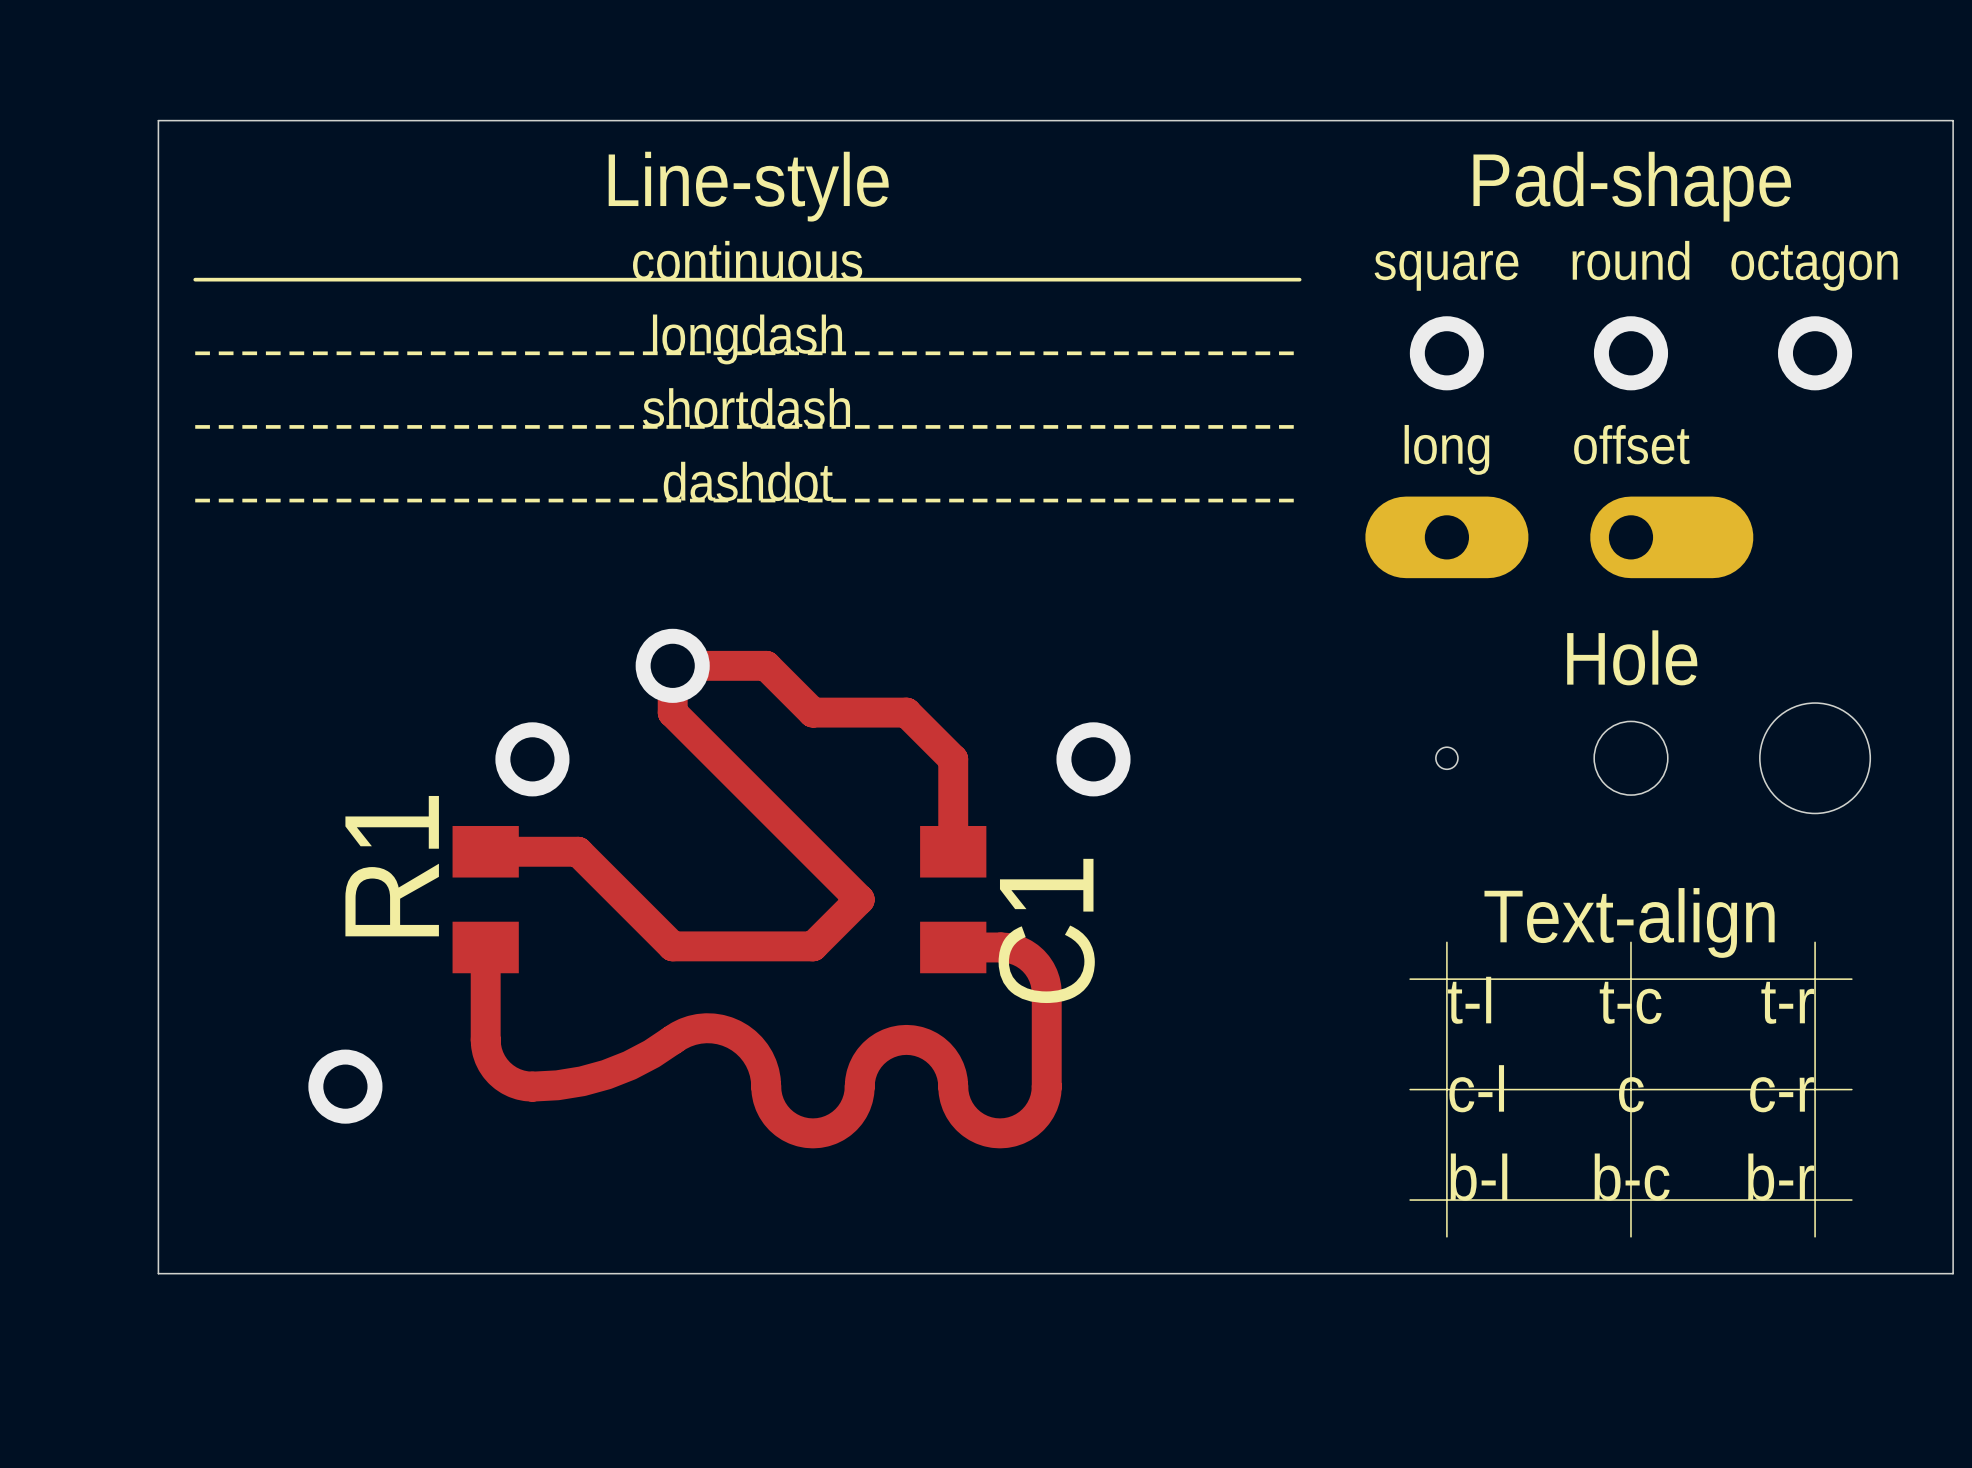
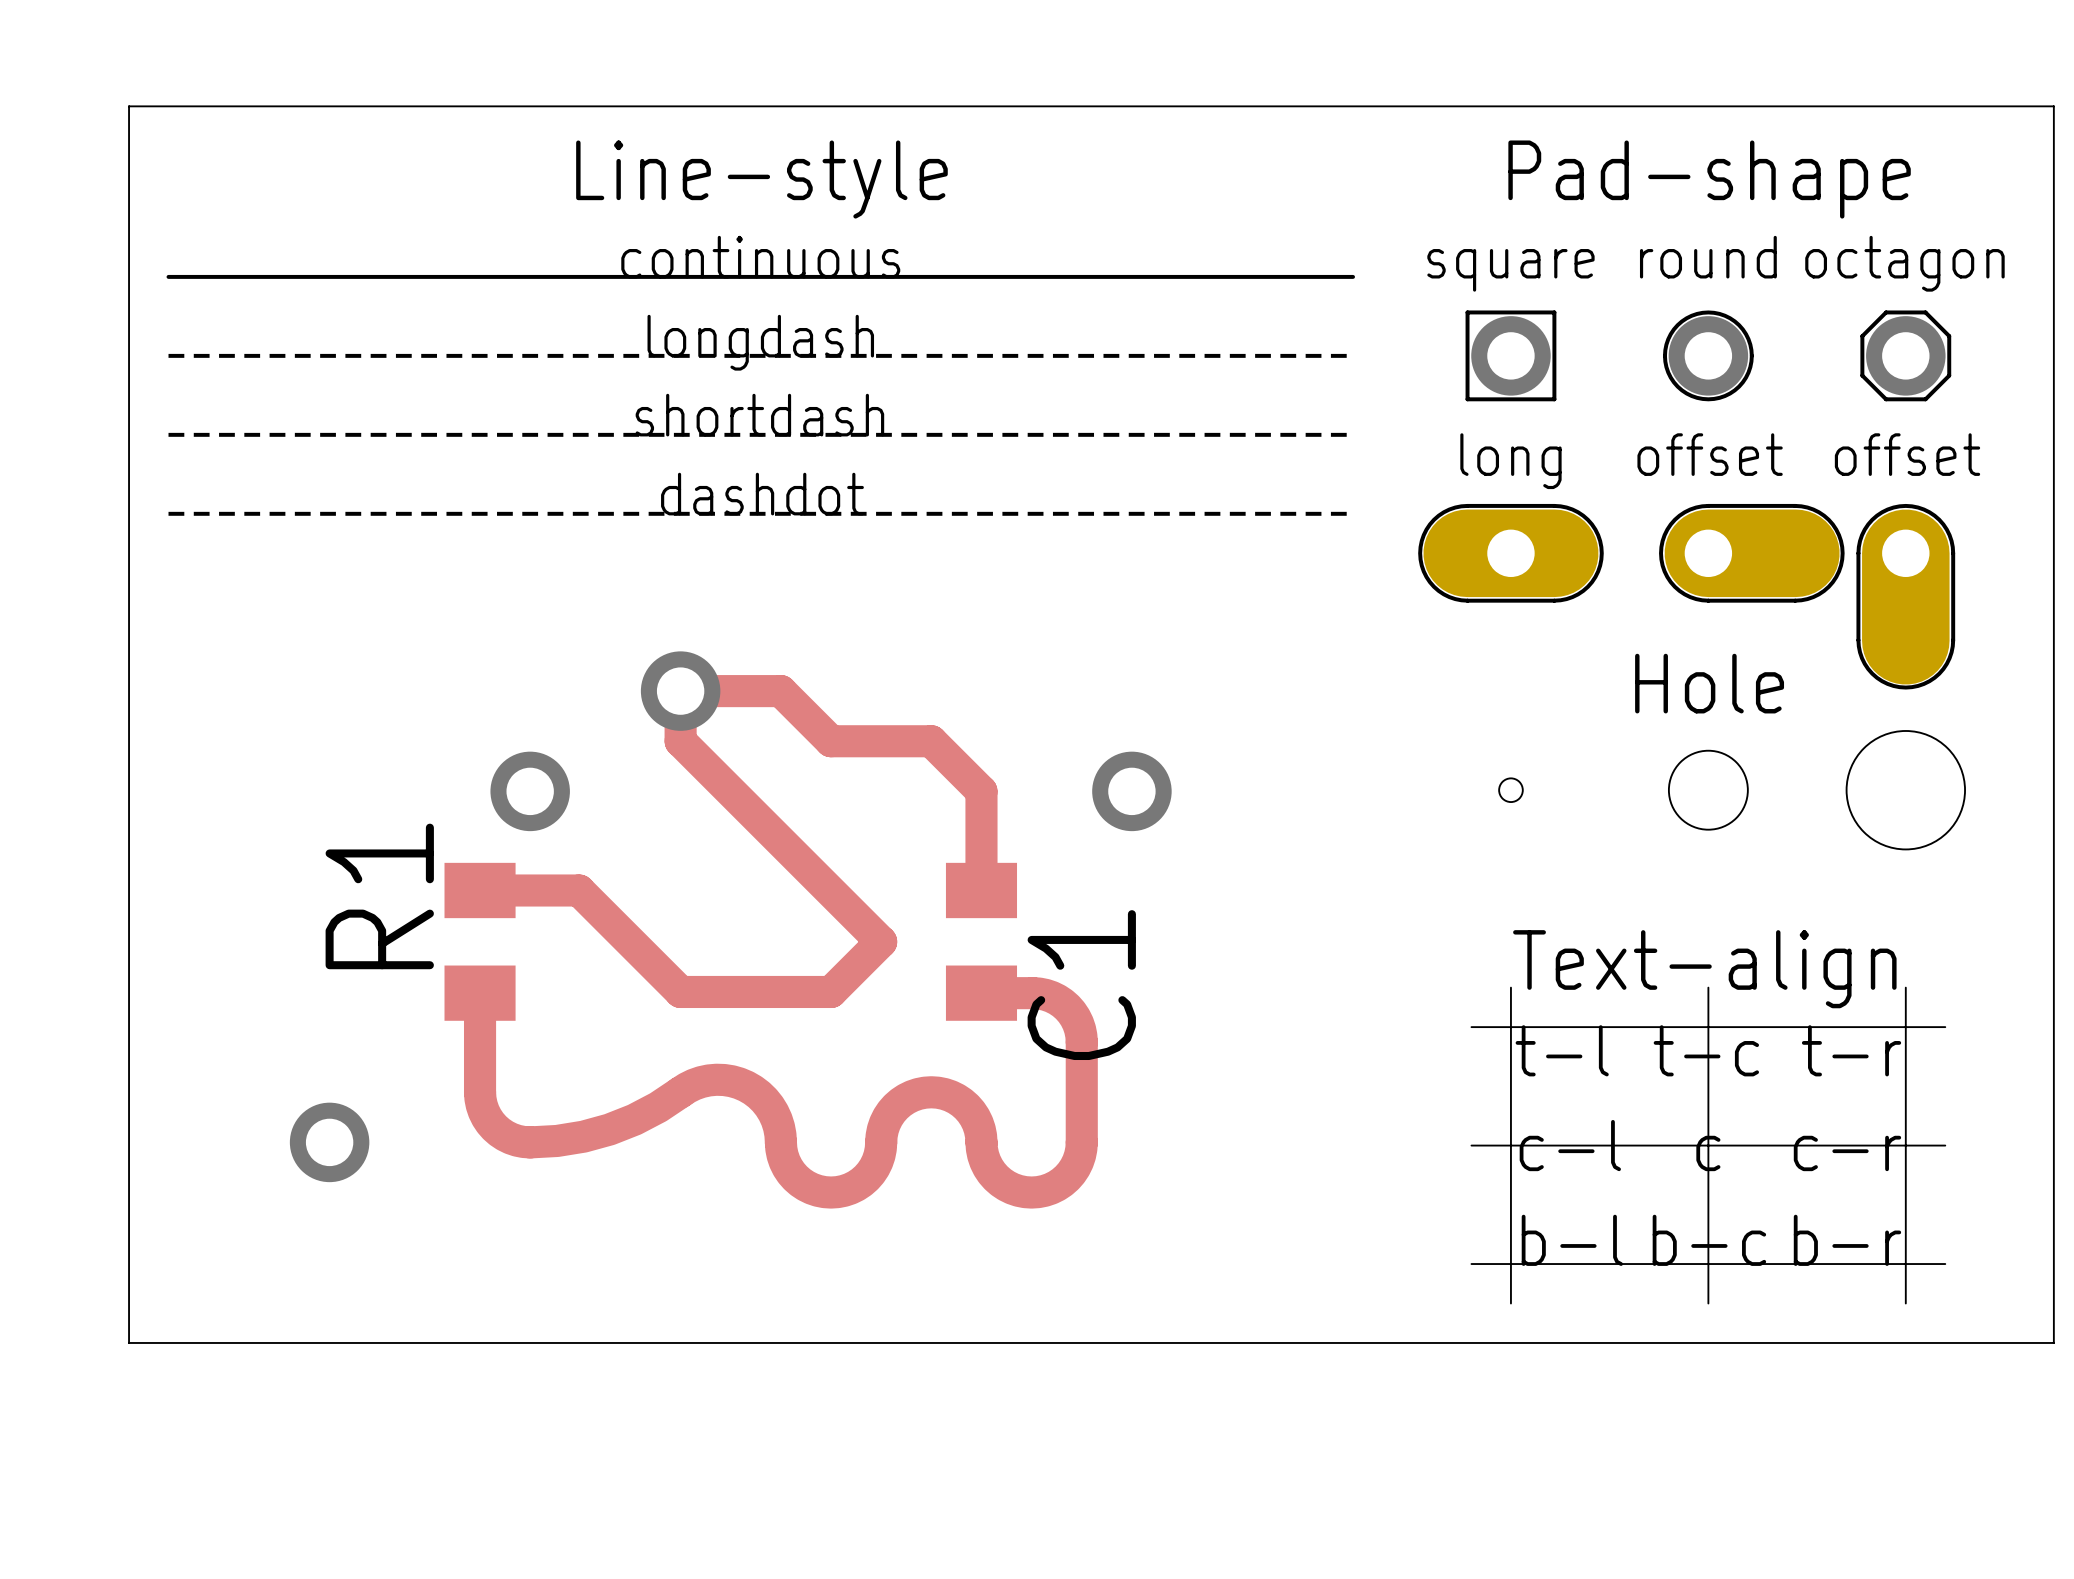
line: none -> (1467, 312) (1554, 312) (1554, 399) (1467, 399) (1467, 312)
line: none -> (1886, 312) (1925, 312) (1949, 336) (1949, 375) (1925, 399) (1886, 399) (1862, 375) (1862, 336) (1886, 312)
line: none -> (1664, 355) (1668, 339) (1677, 325) (1691, 315) (1708, 312) (1725, 315) (1739, 325) (1748, 339) (1751, 355) (1748, 372) (1739, 386) (1725, 396) (1708, 399) (1691, 396) (1677, 386) (1668, 372) (1664, 355)
text: none -> offset (1907, 454)
line: none -> (1467, 505) (1554, 505) (1566, 507) (1578, 512) (1591, 524) (1600, 541) (1601, 559) (1595, 576) (1583, 590) (1572, 597) (1560, 600) (1467, 600) (1455, 599) (1443, 594) (1434, 586) (1423, 571) (1420, 559) (1421, 541) (1429, 524) (1438, 515) (1455, 507) (1467, 505)
line: none -> (1708, 505) (1795, 505) (1807, 507) (1818, 512) (1832, 524) (1841, 541) (1842, 559) (1836, 576) (1824, 590) (1813, 597) (1801, 600) (1708, 600) (1696, 599) (1684, 594) (1674, 586) (1664, 571) (1661, 559) (1662, 541) (1670, 524) (1679, 515) (1696, 507) (1708, 505)
line: none -> (1858, 553) (1858, 640) (1860, 652) (1864, 663) (1876, 677) (1893, 685) (1911, 687) (1929, 681) (1943, 669) (1949, 658) (1952, 646) (1953, 553) (1951, 541) (1946, 529) (1939, 519) (1923, 509) (1911, 506) (1893, 507) (1876, 515) (1868, 524) (1860, 541) (1858, 553)
part: none -> (1905, 597)

